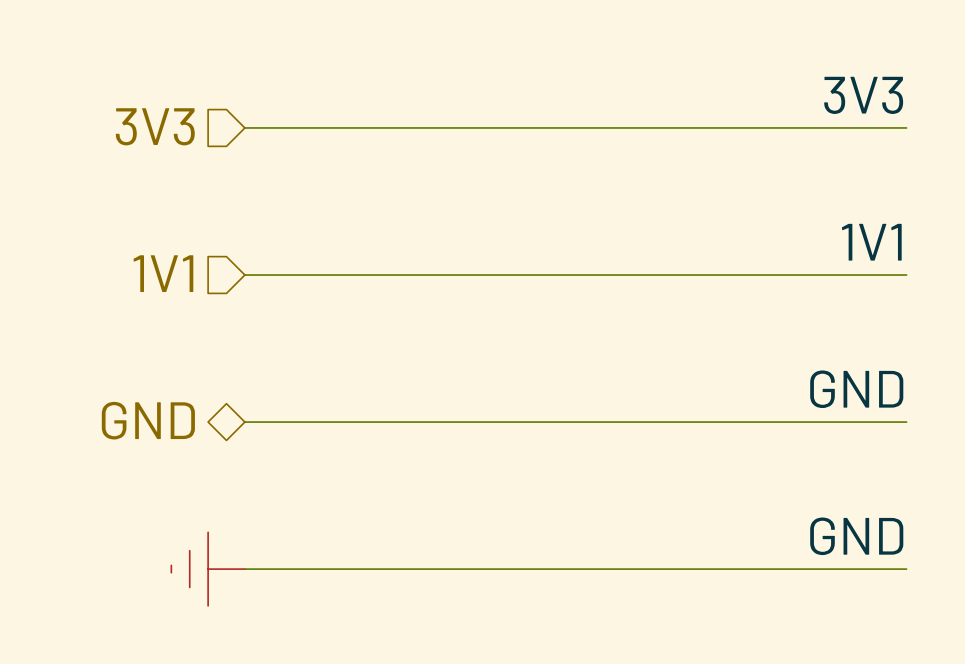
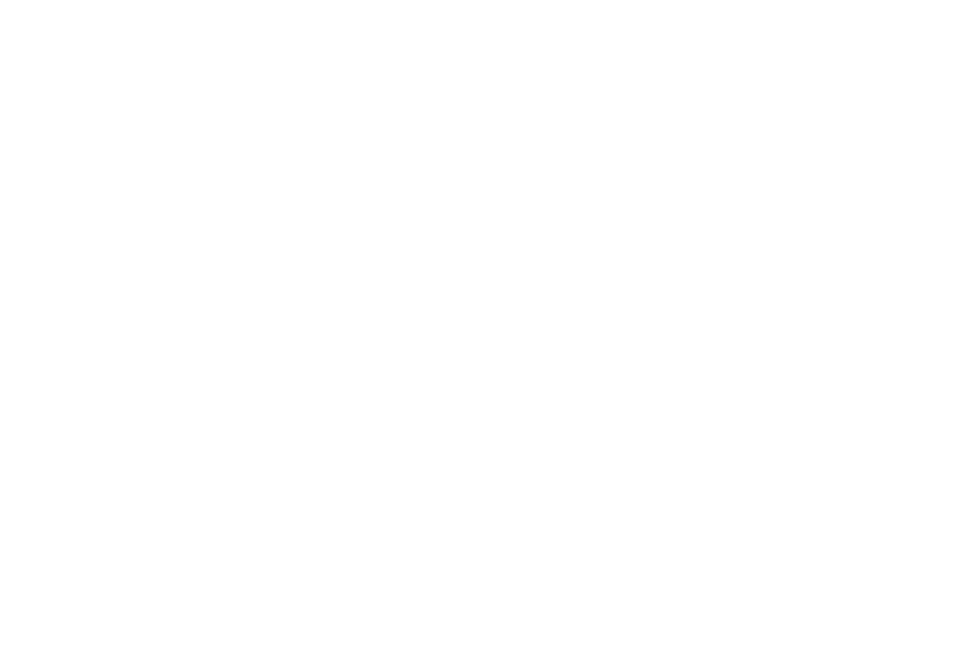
label: 3V3 (863, 95) -> none
hierarchical label: 3V3 (155, 126) -> none
wire: (244, 127) (906, 127) -> none
label: 1V1 (871, 242) -> none
hierarchical label: 1V1 (163, 273) -> none
wire: (244, 275) (906, 275) -> none
label: GND (856, 389) -> none
hierarchical label: GND (148, 420) -> none
wire: (244, 422) (906, 422) -> none
label: GND (856, 536) -> none
power symbol: (208, 569) -> none
wire: (244, 569) (906, 569) -> none

